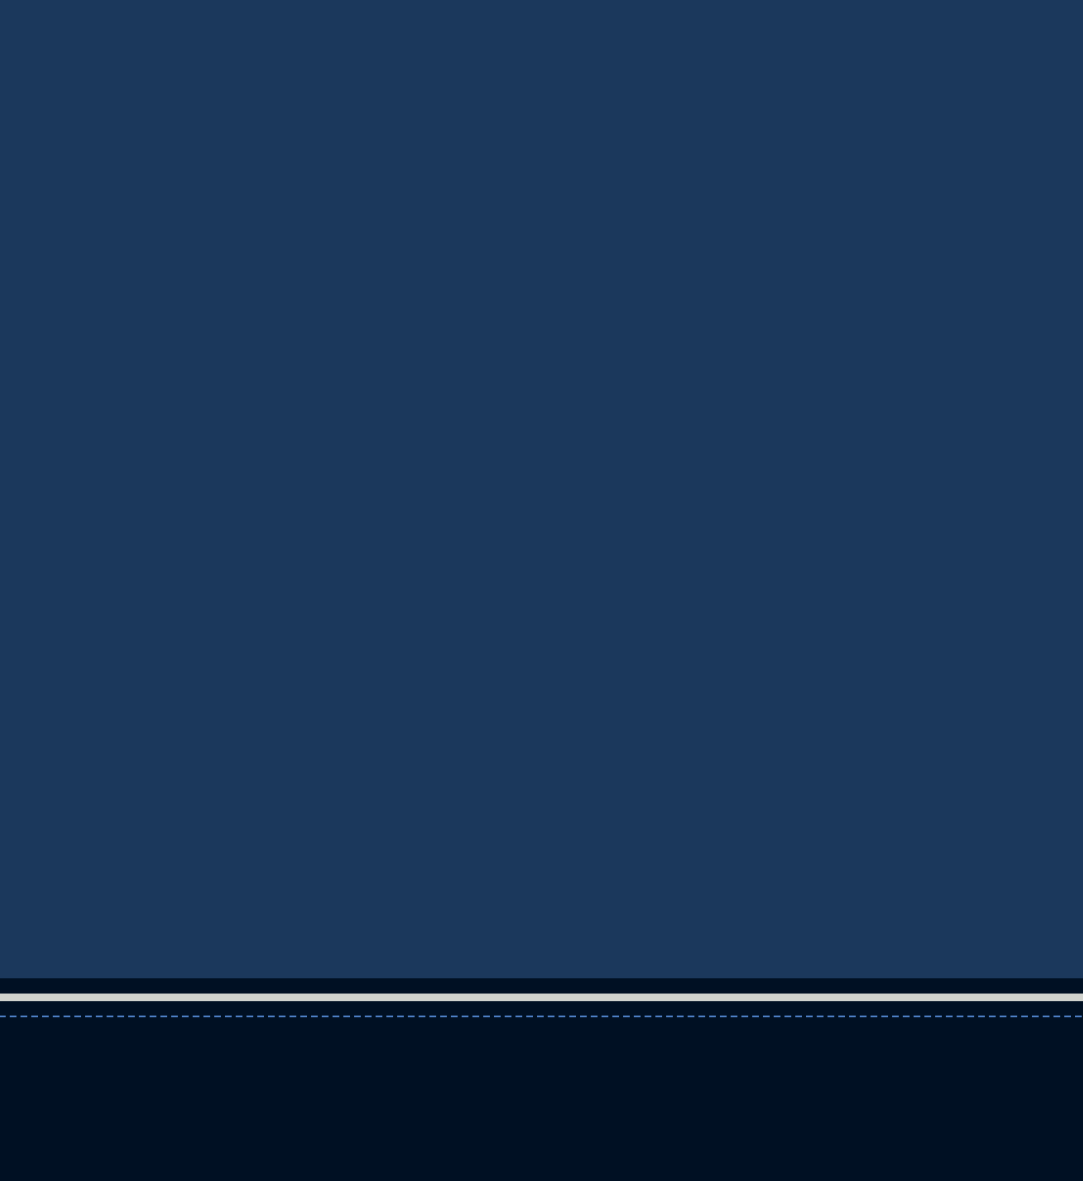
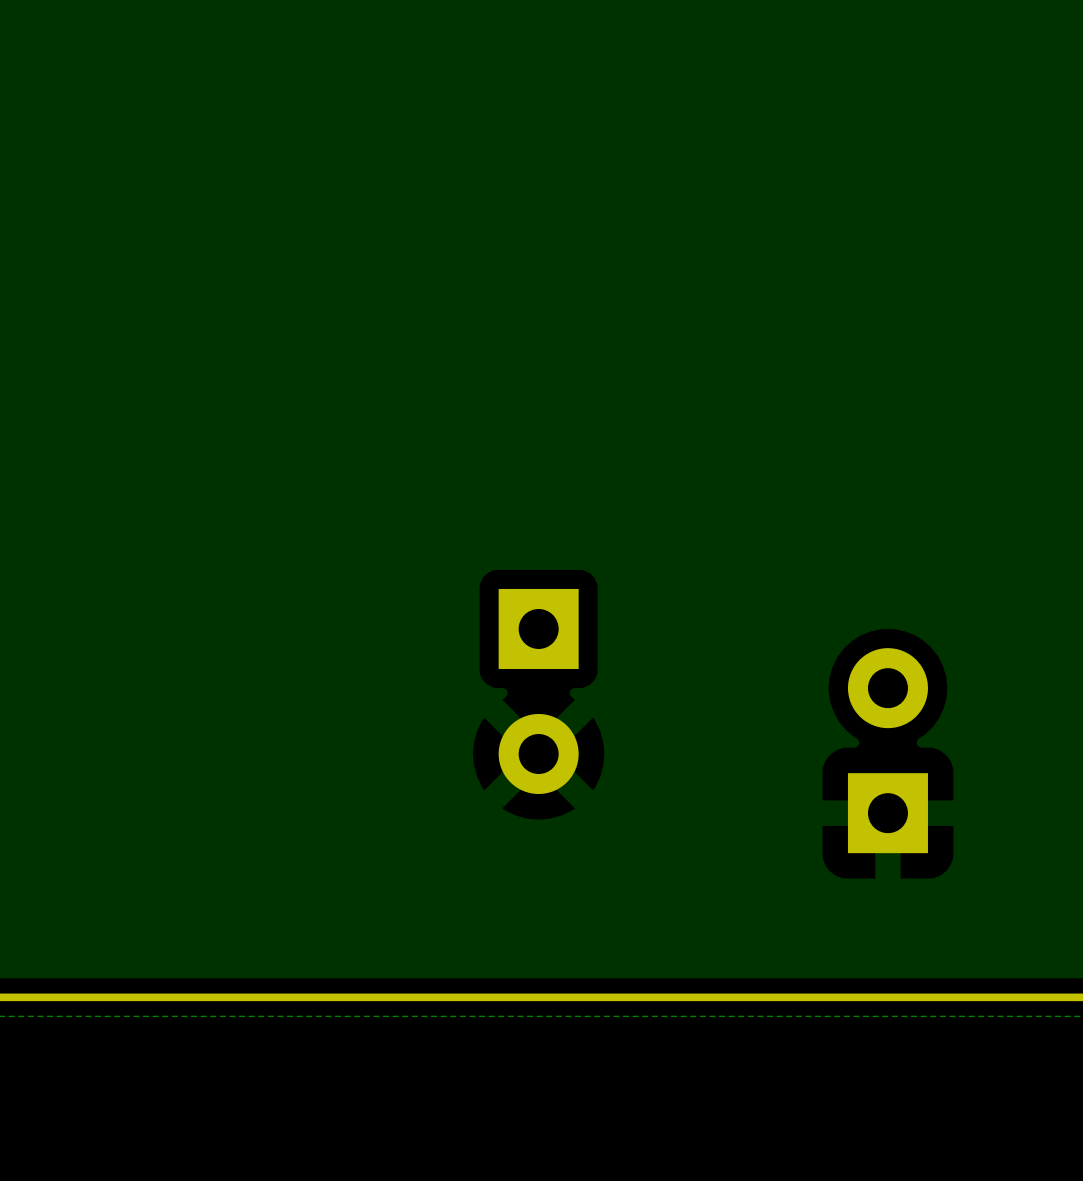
part: none -> (538, 691)
part: none -> (887, 750)

